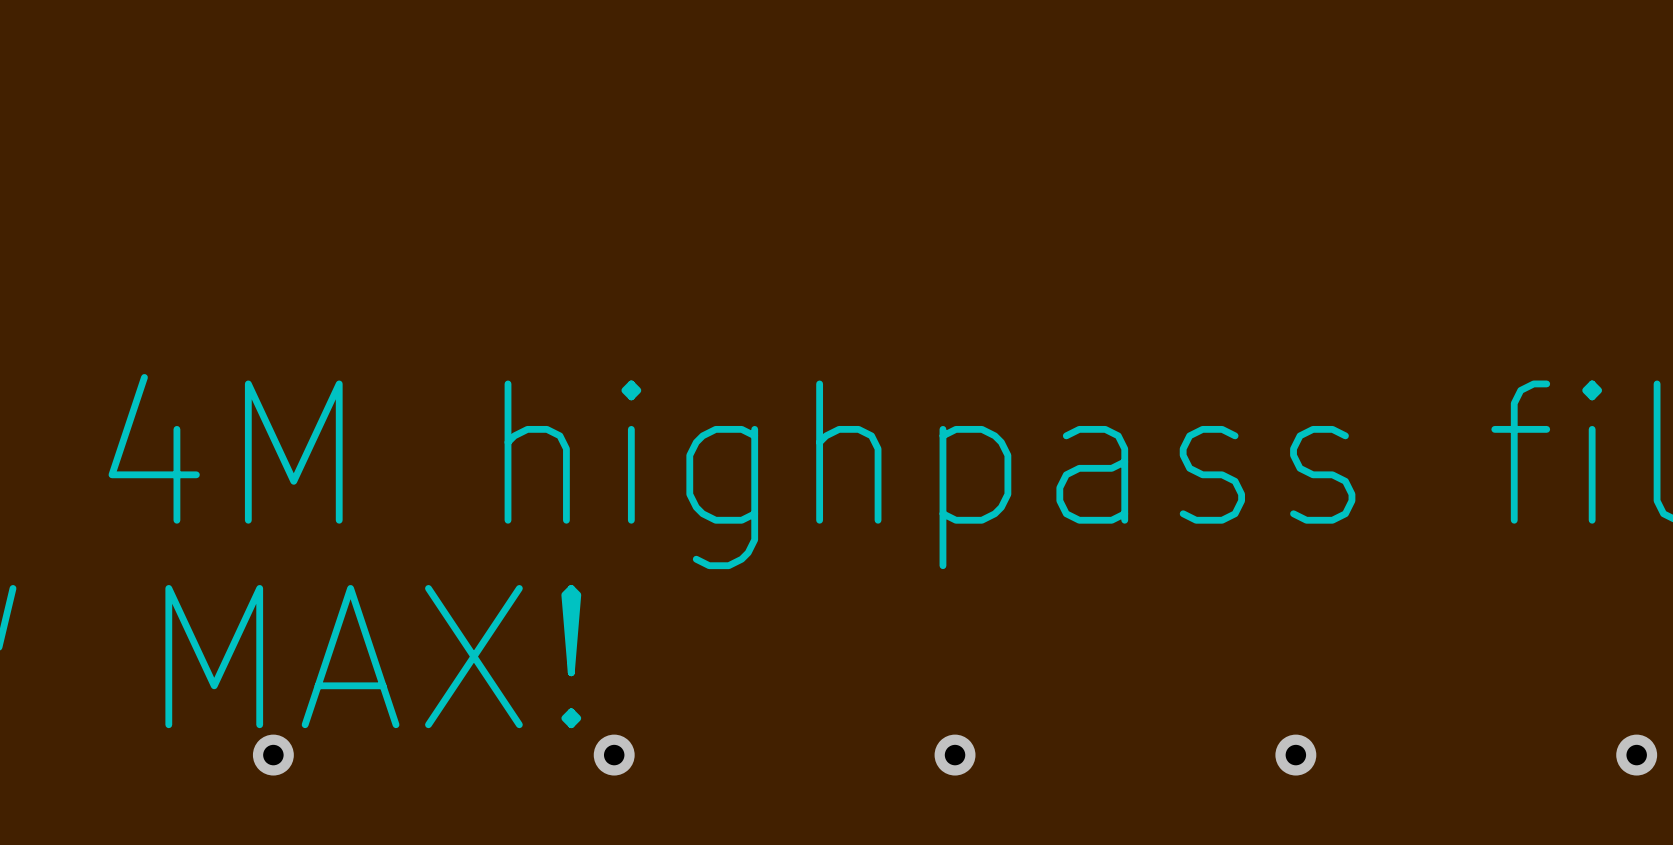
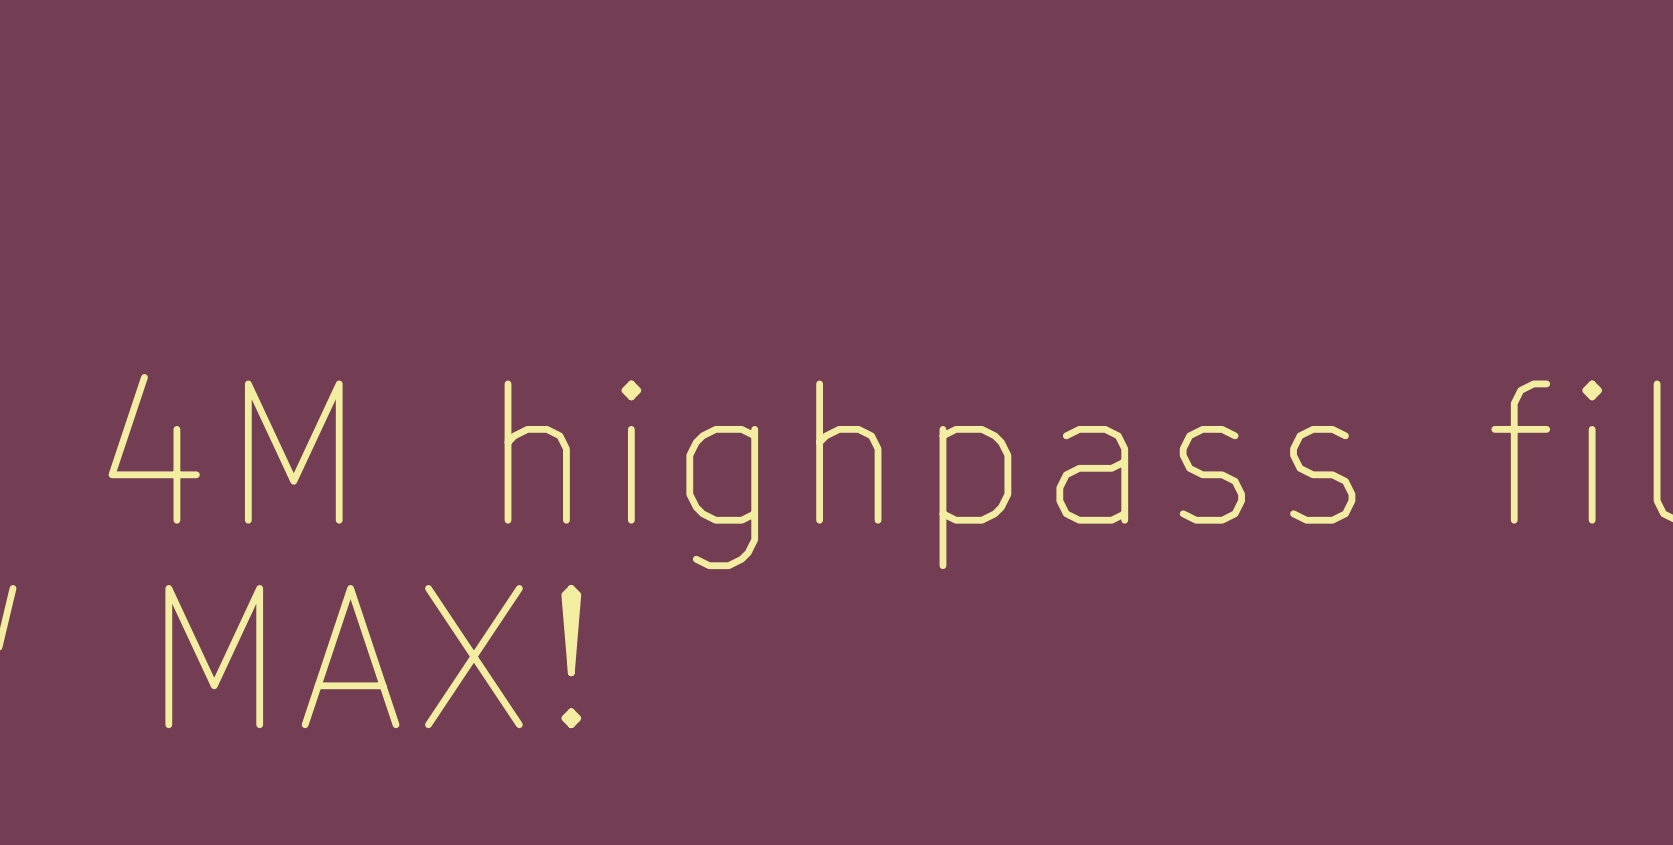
via: (273, 755) -> none
via: (614, 755) -> none
via: (955, 755) -> none
via: (1295, 755) -> none
via: (1636, 755) -> none

